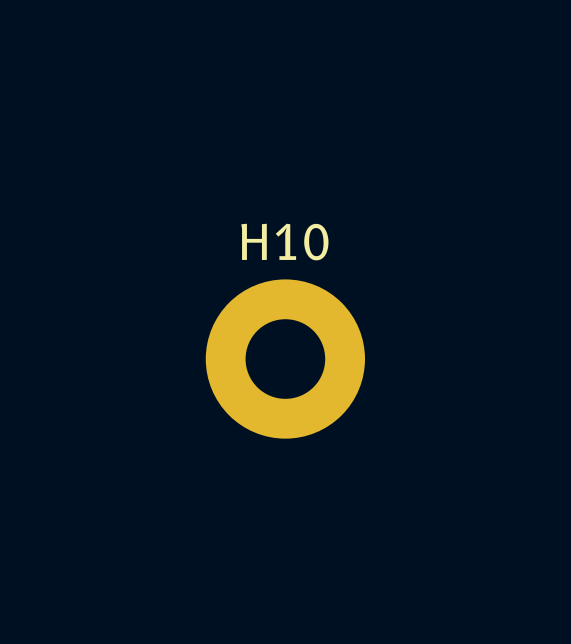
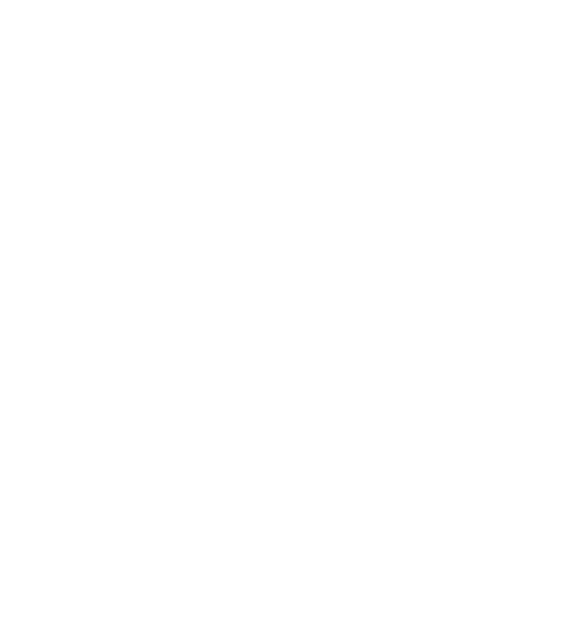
H10: (285, 359) -> none

